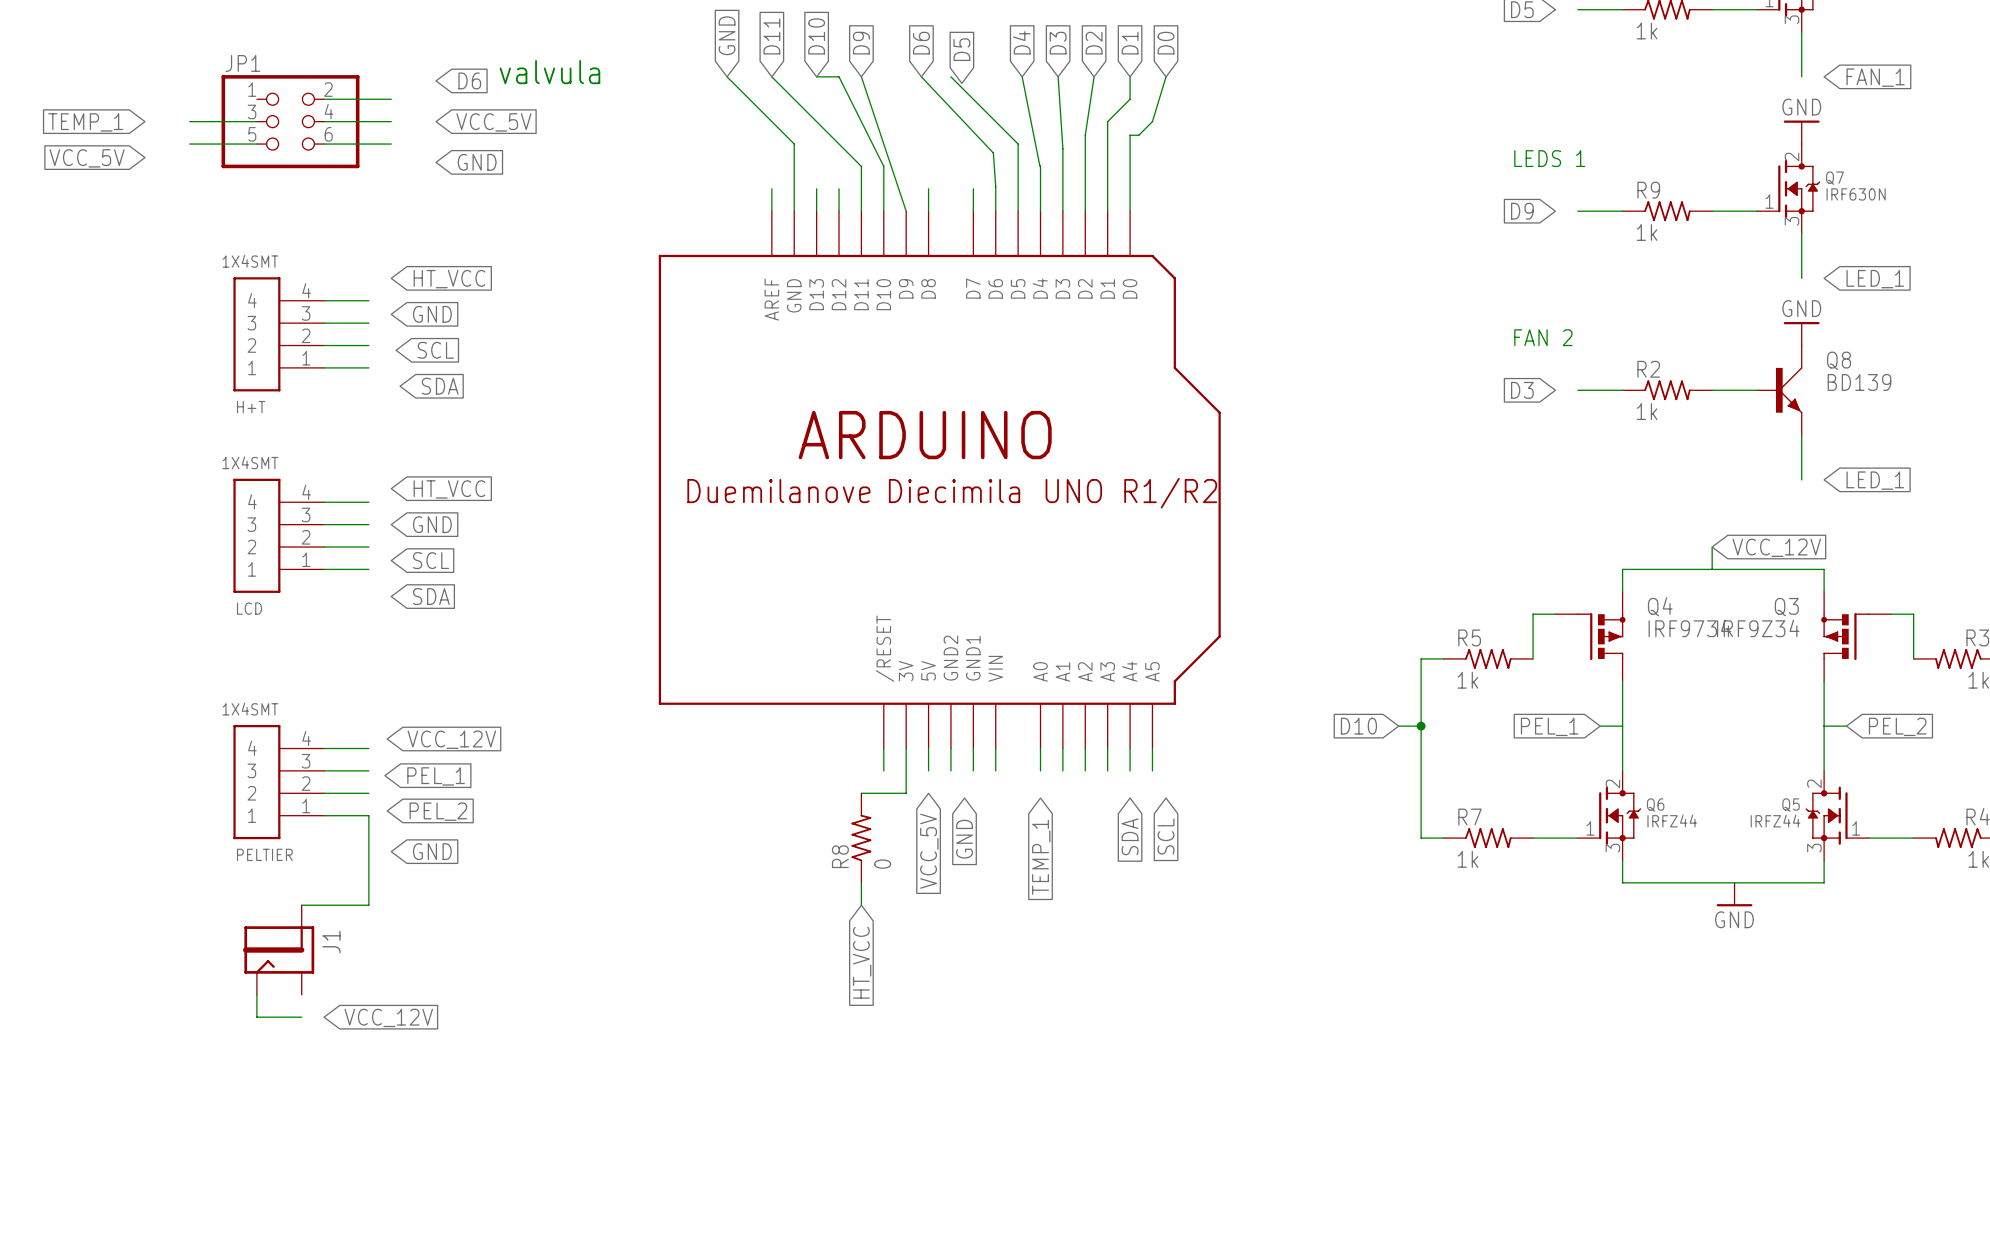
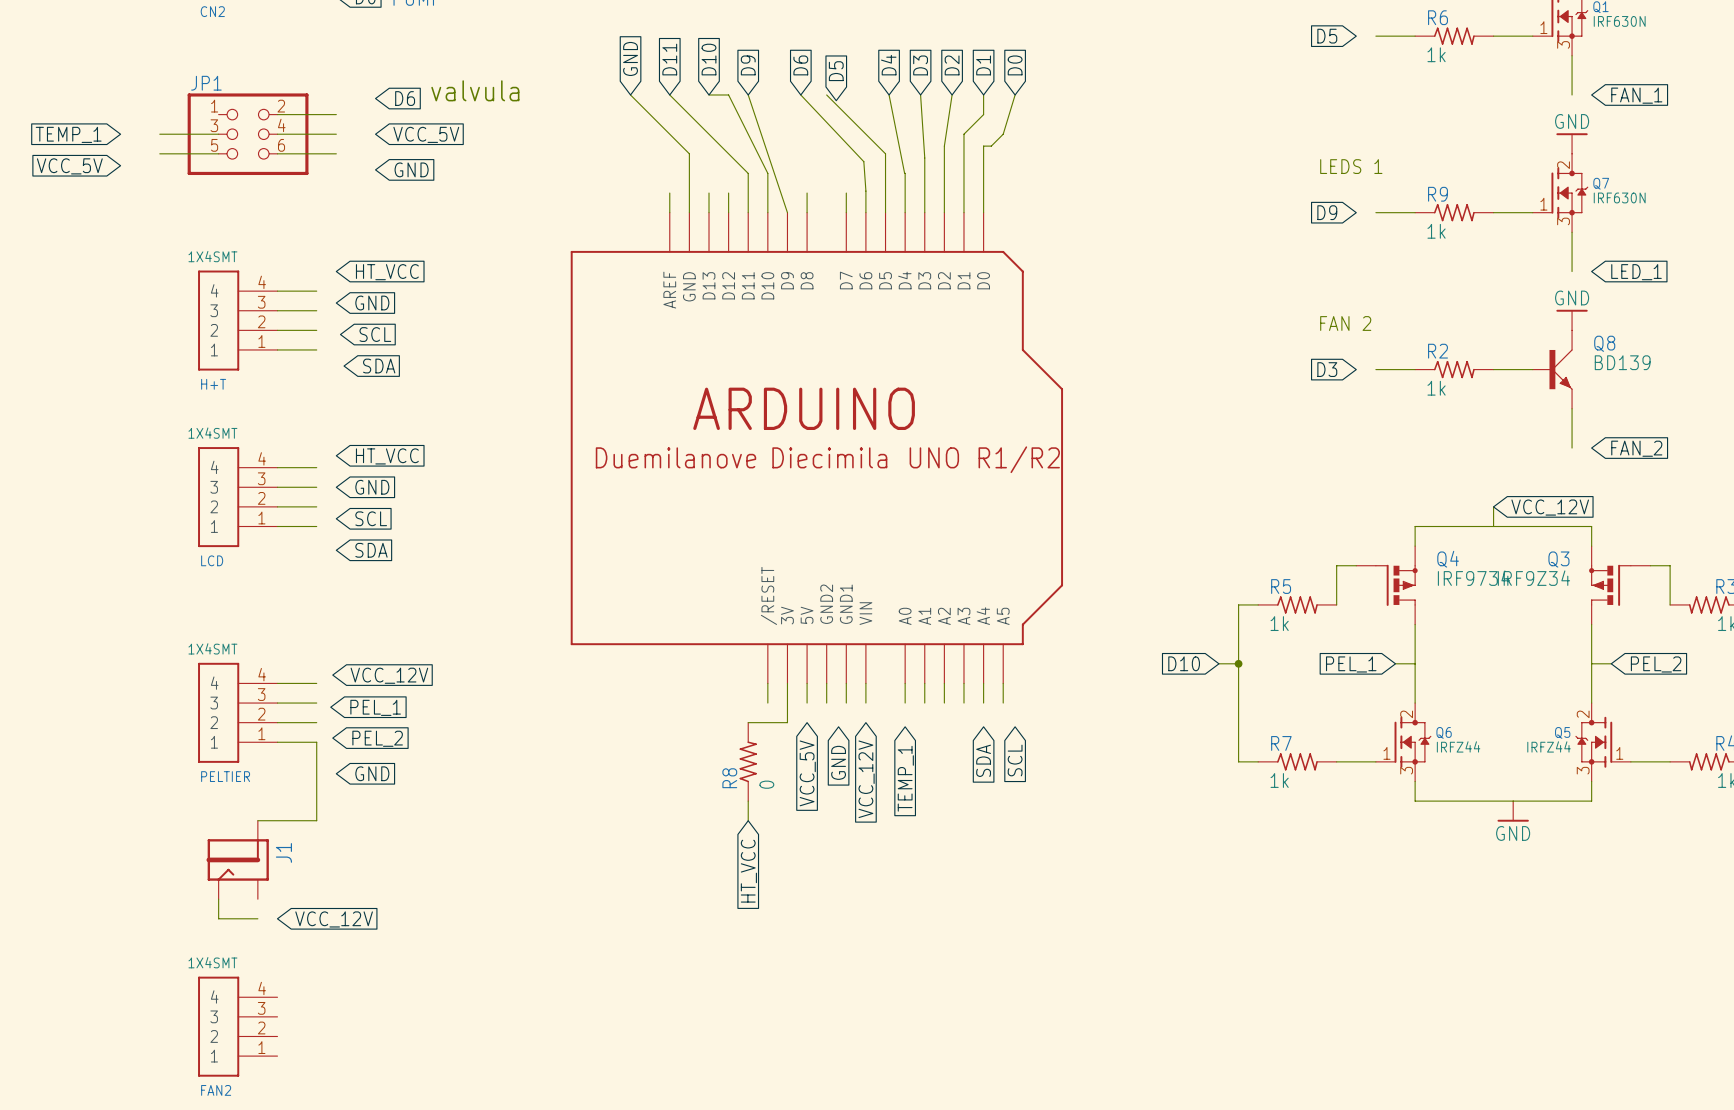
global label: LED_1 (1875, 480) -> FAN_2 (1636, 448)
global label: none -> VCC_12V (866, 779)
FAN2: none -> 1X4SMT (237, 1026)

